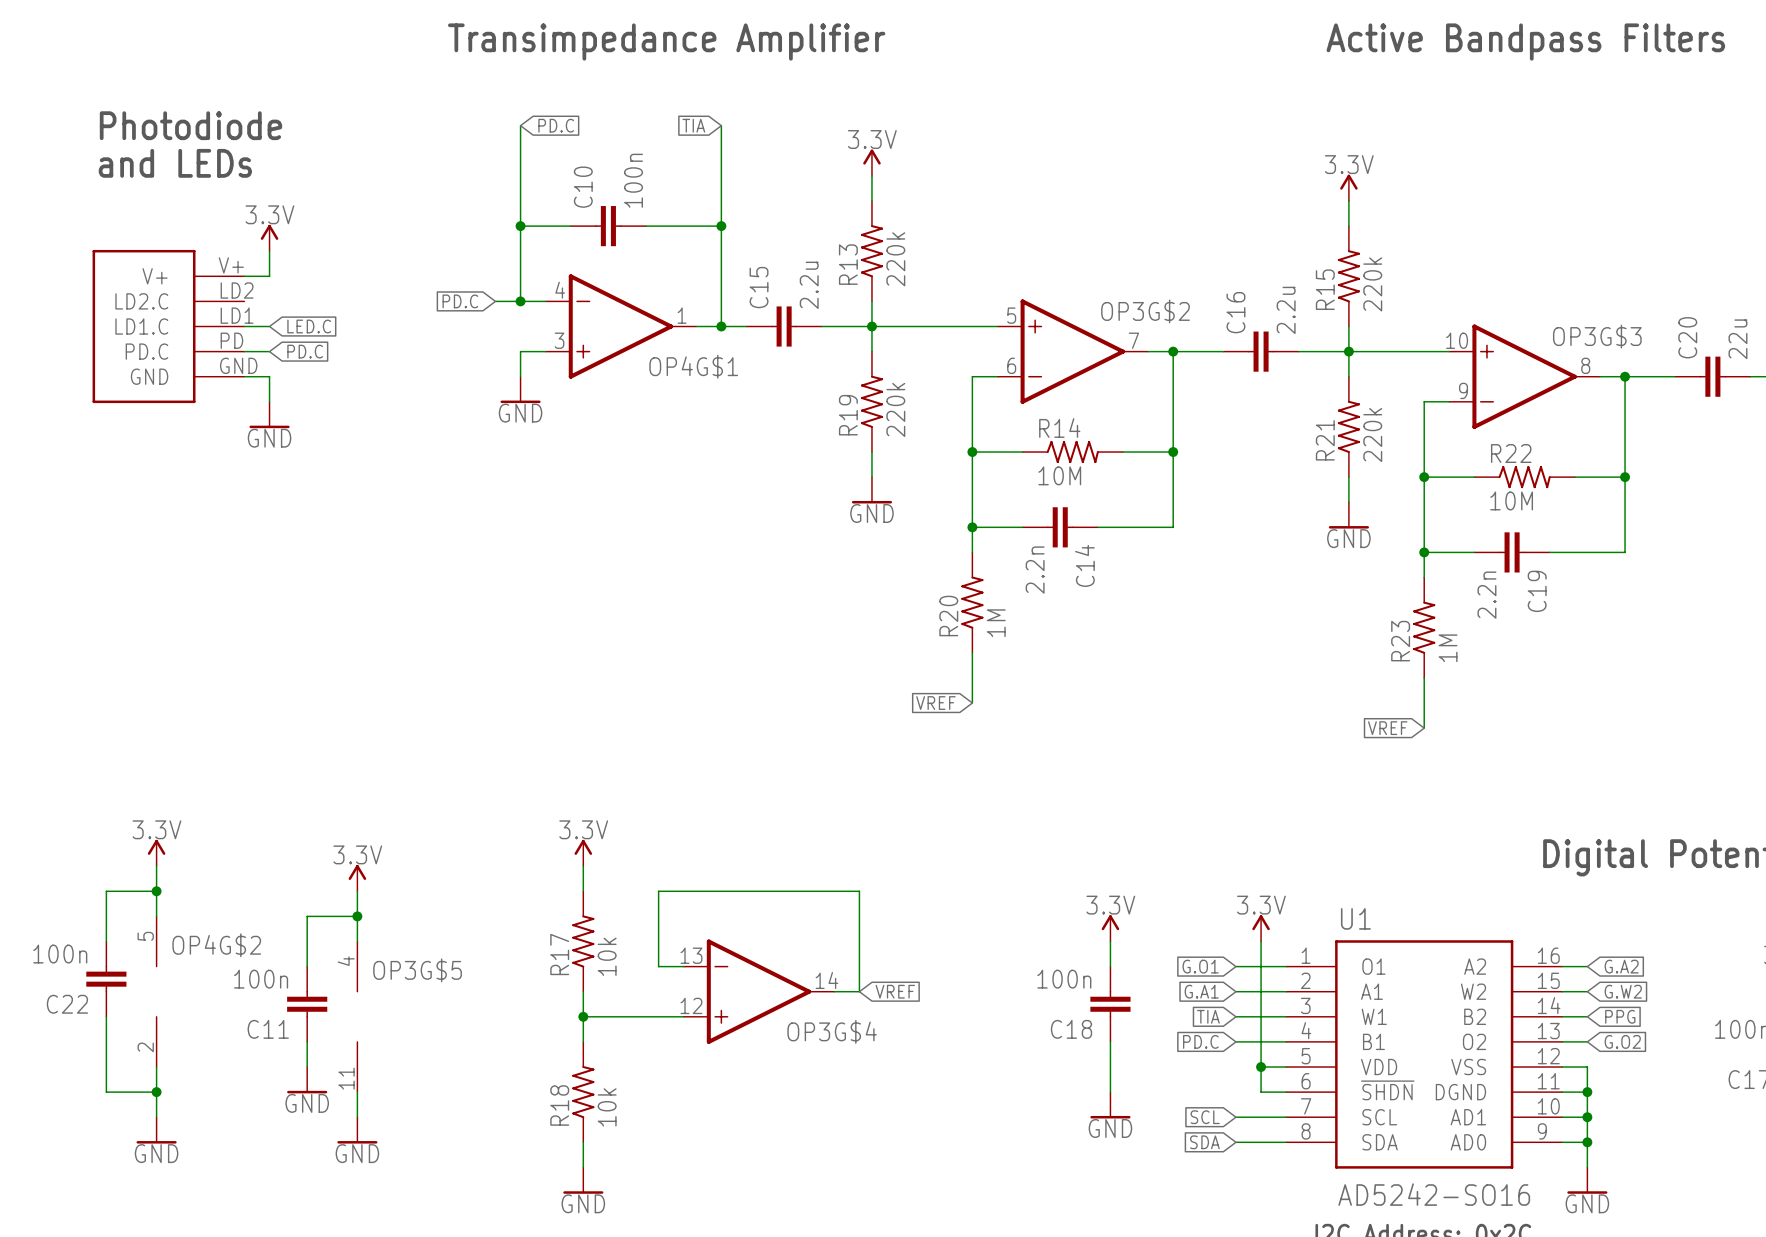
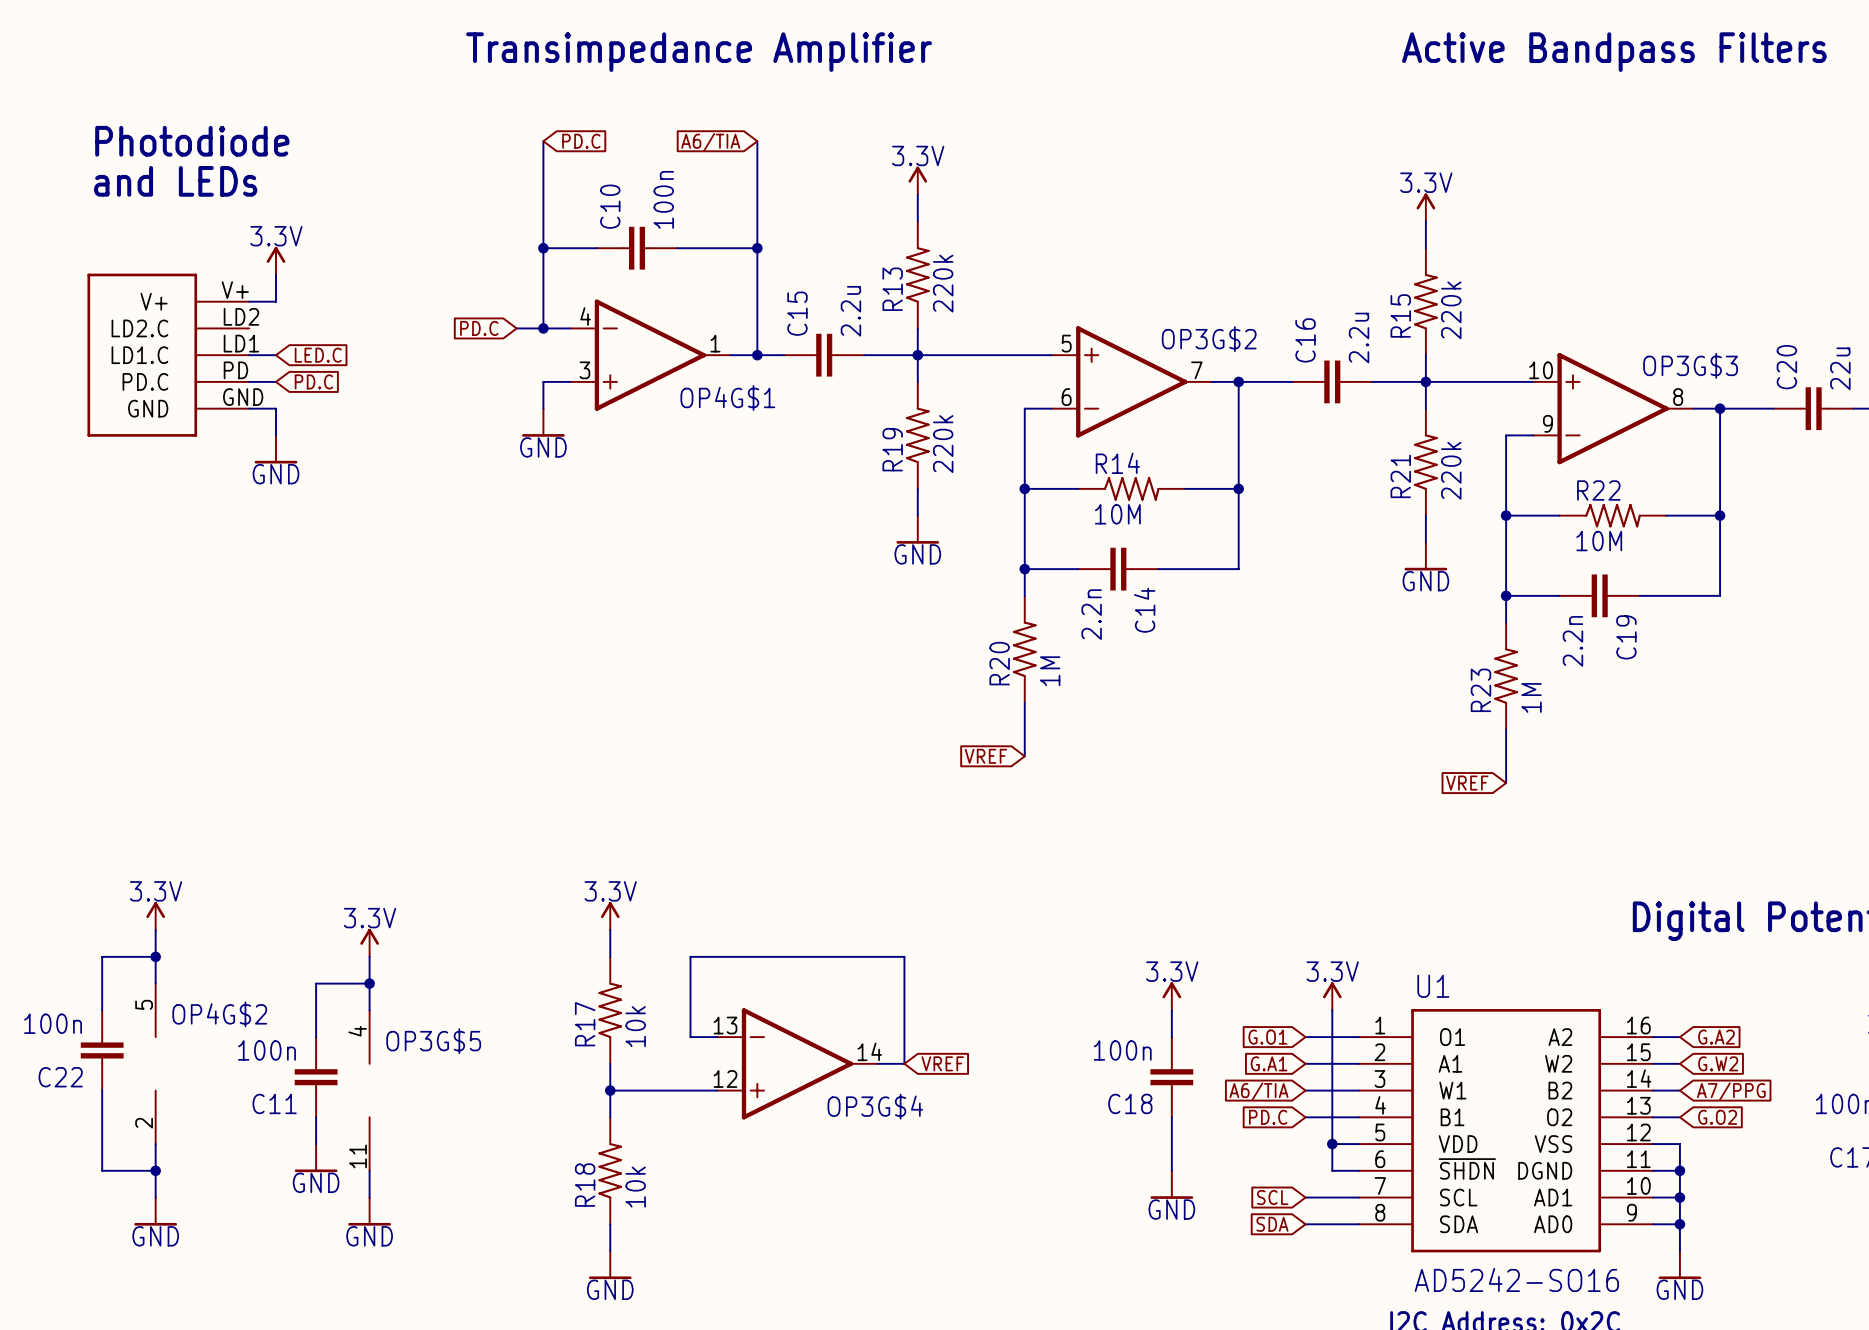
global label: TIA (693, 125) -> A6/TIA (710, 142)
global label: TIA (1208, 1016) -> A6/TIA (1259, 1091)
global label: PPG (1620, 1016) -> A7/PPG (1731, 1091)

